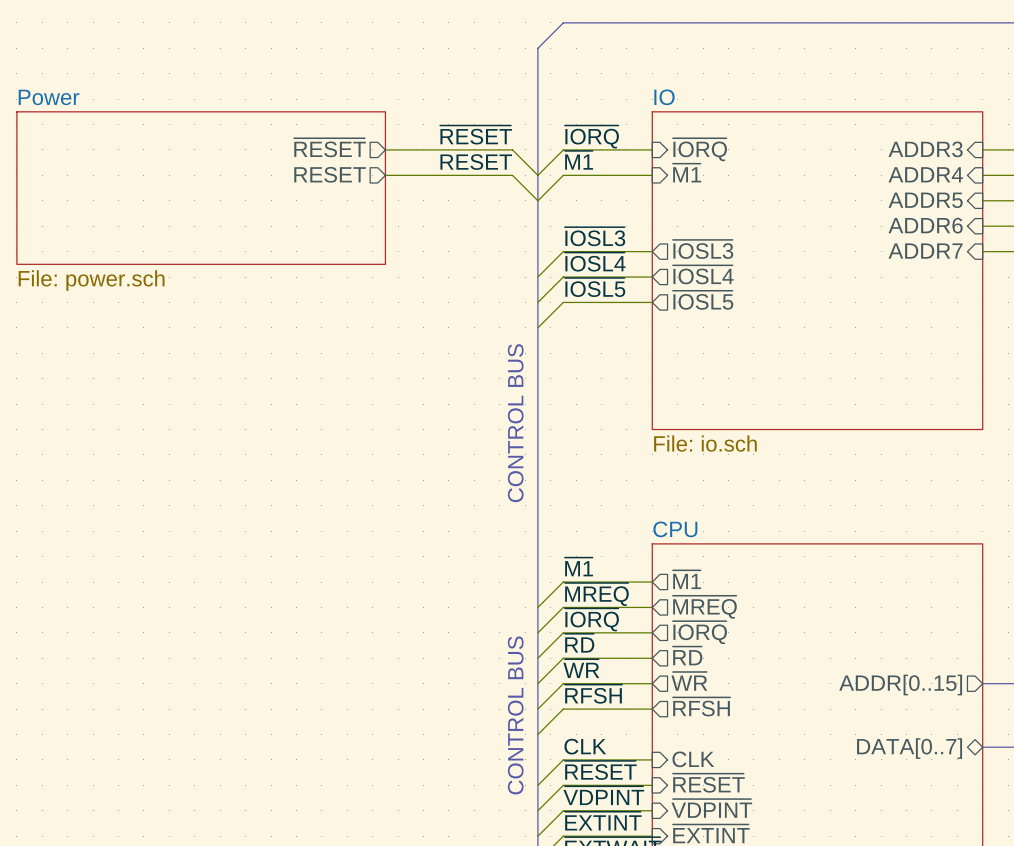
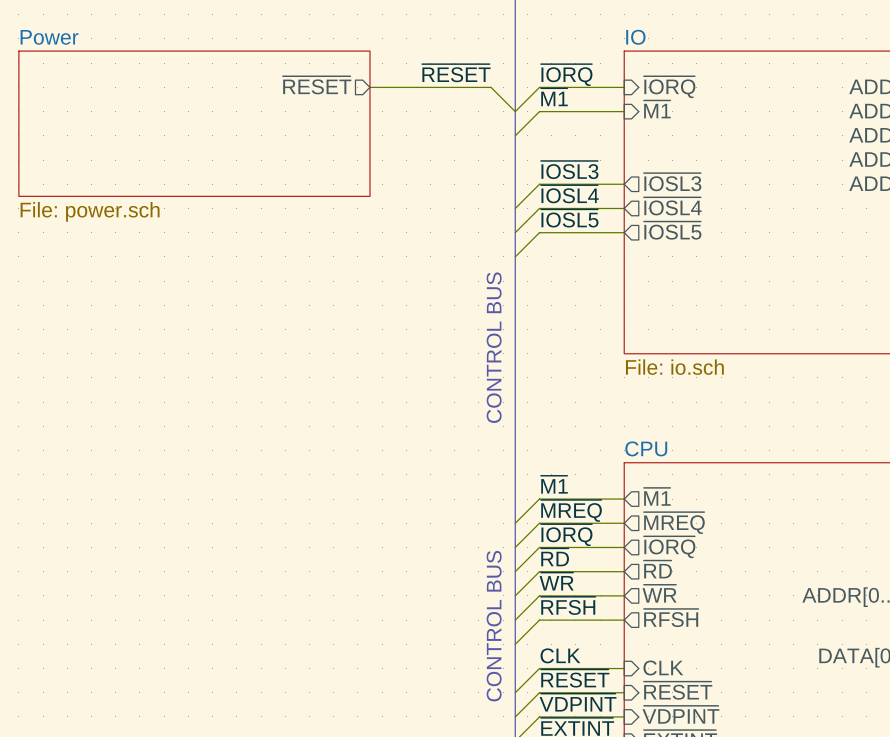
label: RESET (476, 162) -> none
sheet pin: RESET (330, 174) -> none
wire: (385, 175) (512, 175) (537, 200) -> none

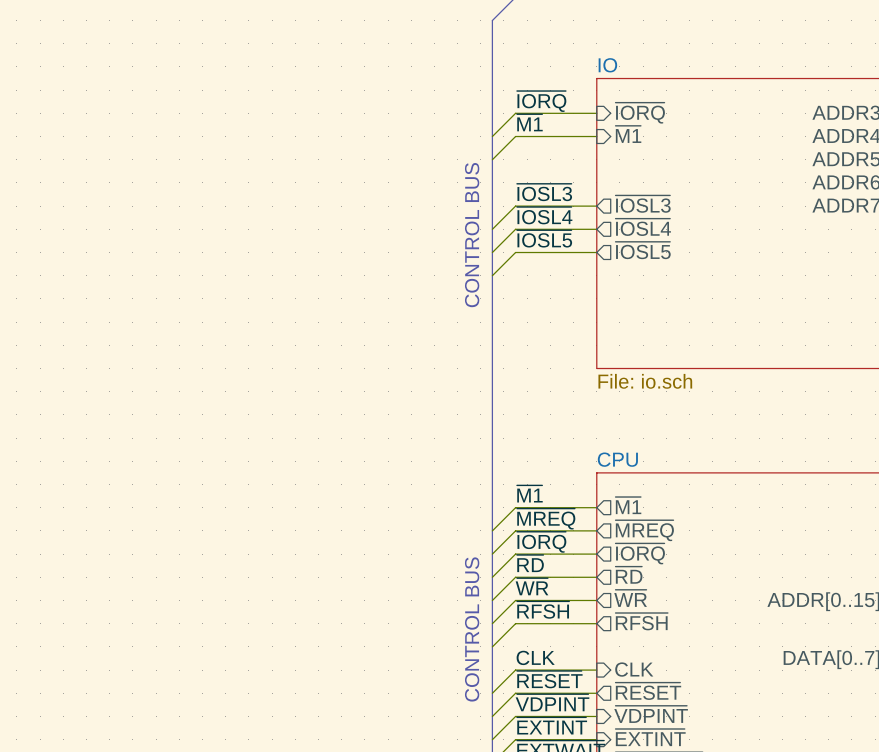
label: ~{RESET} (456, 73) -> none
sheet pin: ~{RESET} (317, 85) -> none
wire: (370, 87) (491, 87) (515, 111) -> none
sheet Power: File: power.sch (194, 123) -> none
text position: CONTROL BUS (494, 347) -> CONTROL BUS (472, 235)
sheet pin shape: input (678, 690) -> output (648, 691)

